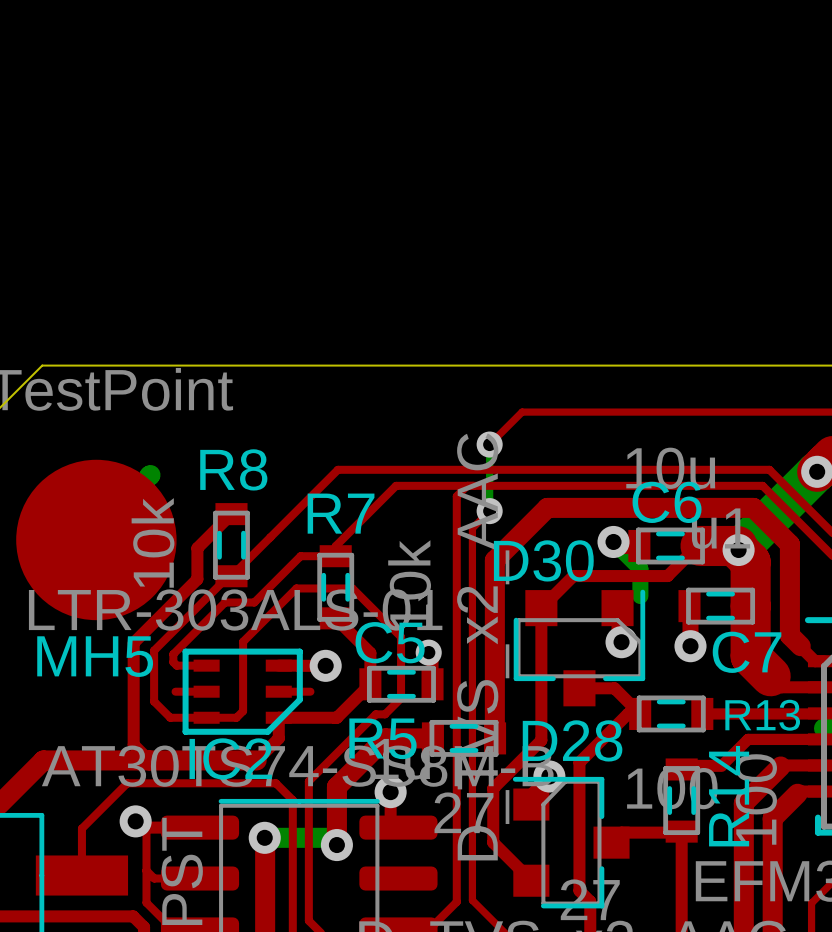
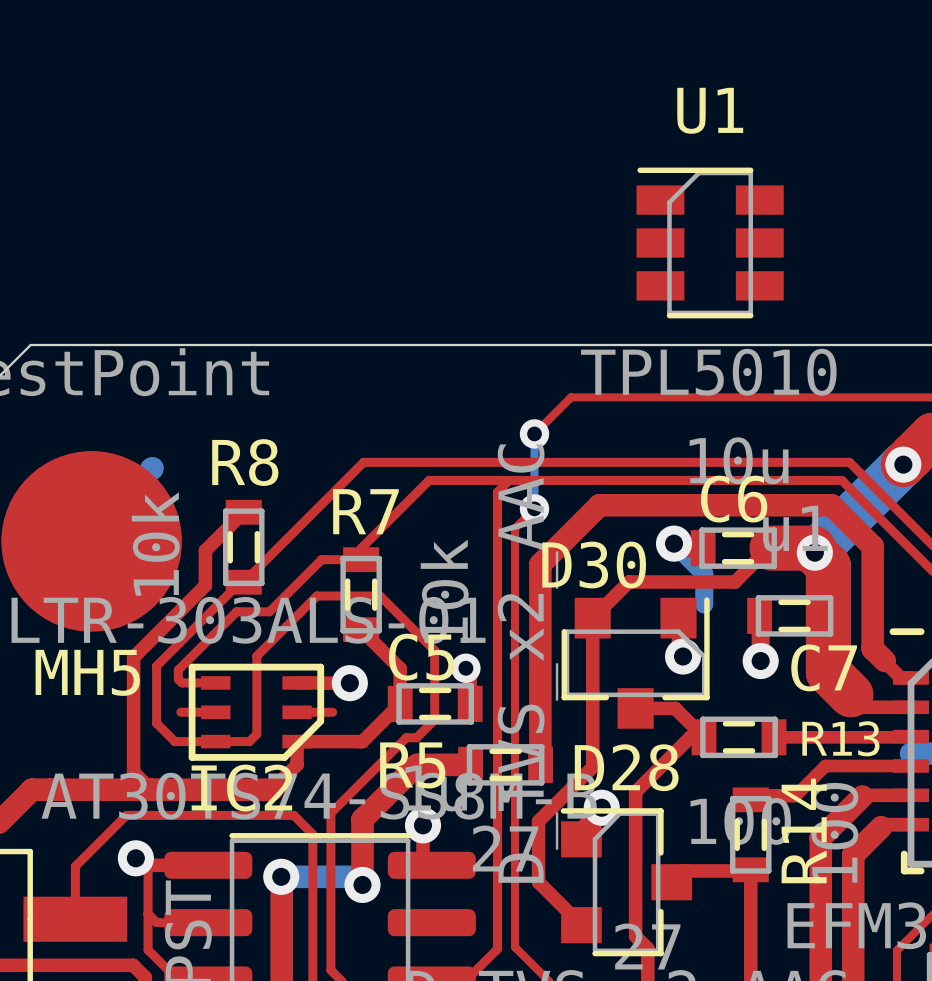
U1: none -> TPL5010 (710, 242)

